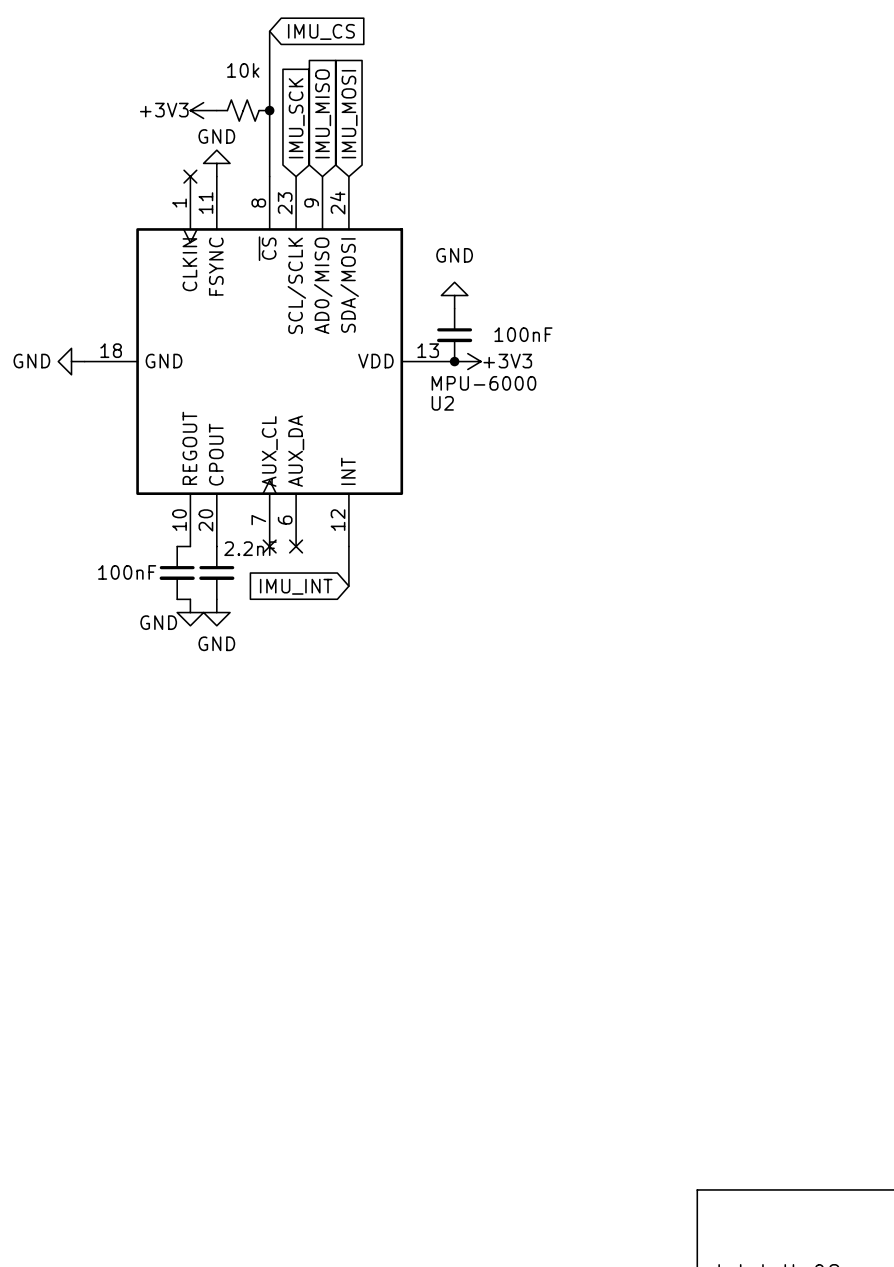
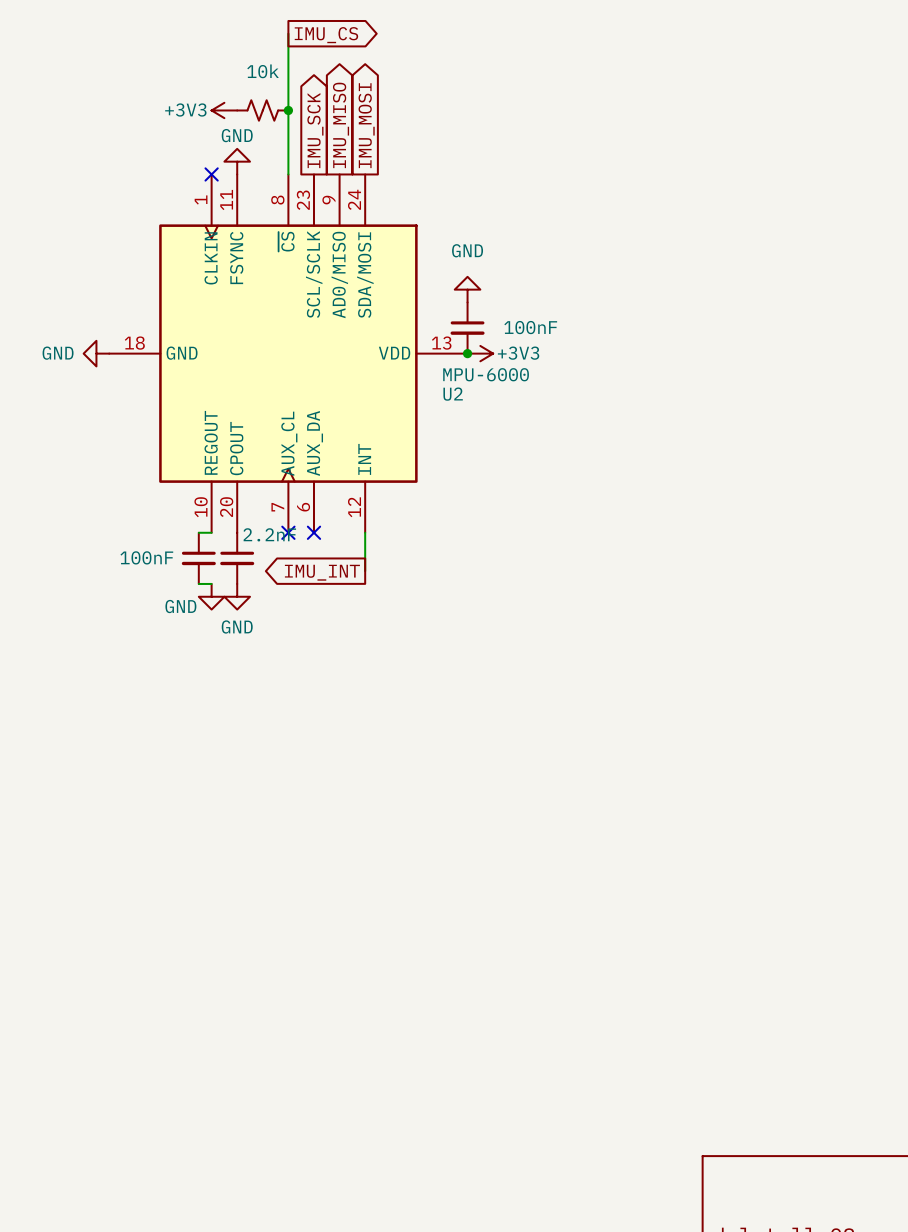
global label shape: input (321, 31) -> output (326, 35)
global label shape: input (323, 113) -> output (341, 125)
global label shape: input (349, 114) -> output (366, 125)
global label shape: input (296, 118) -> output (315, 130)
global label shape: input (296, 586) -> output (322, 572)

